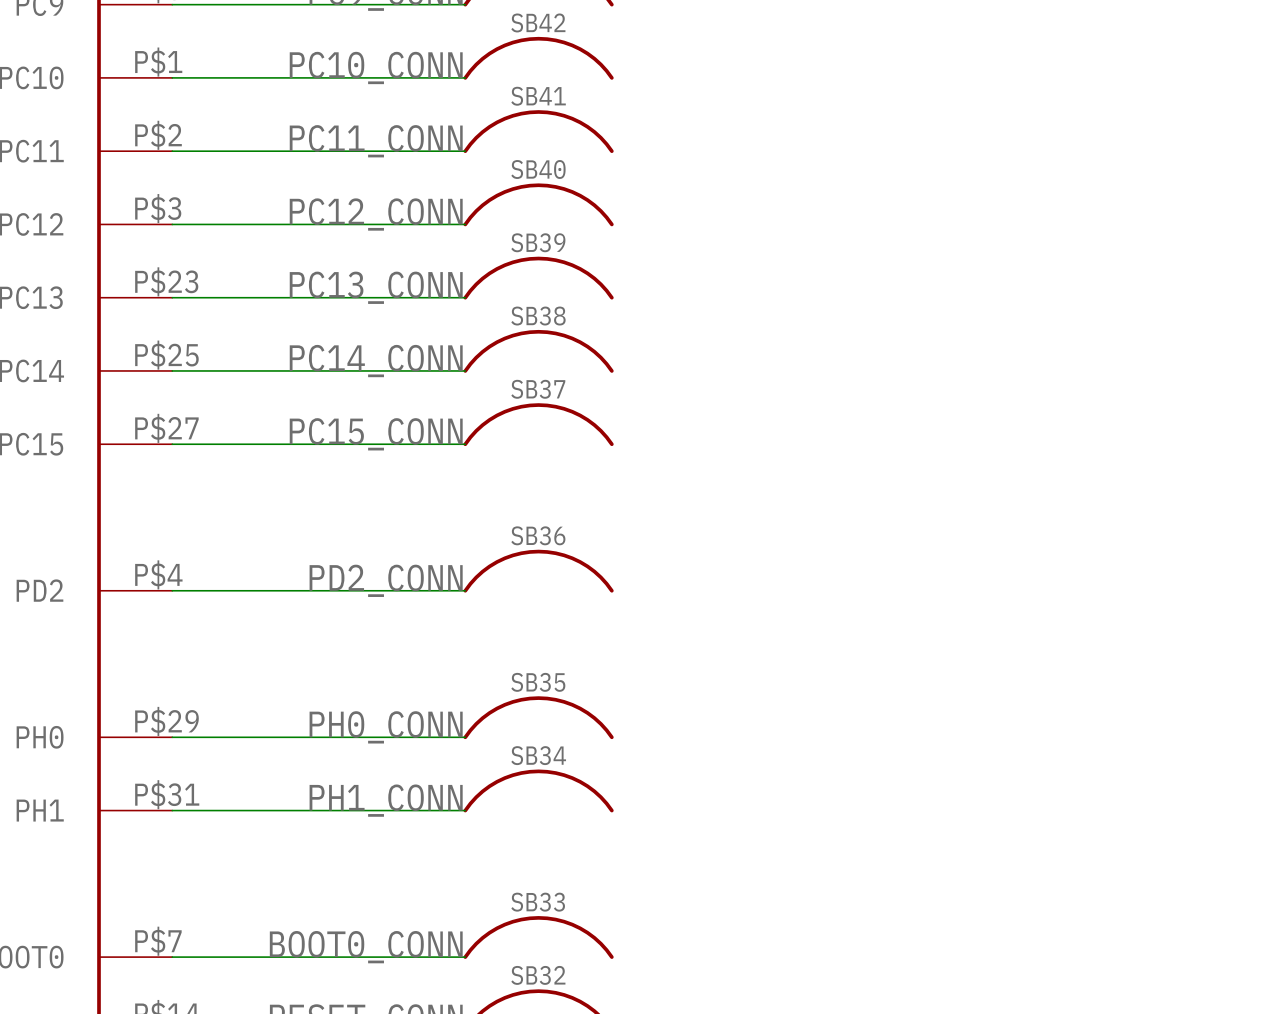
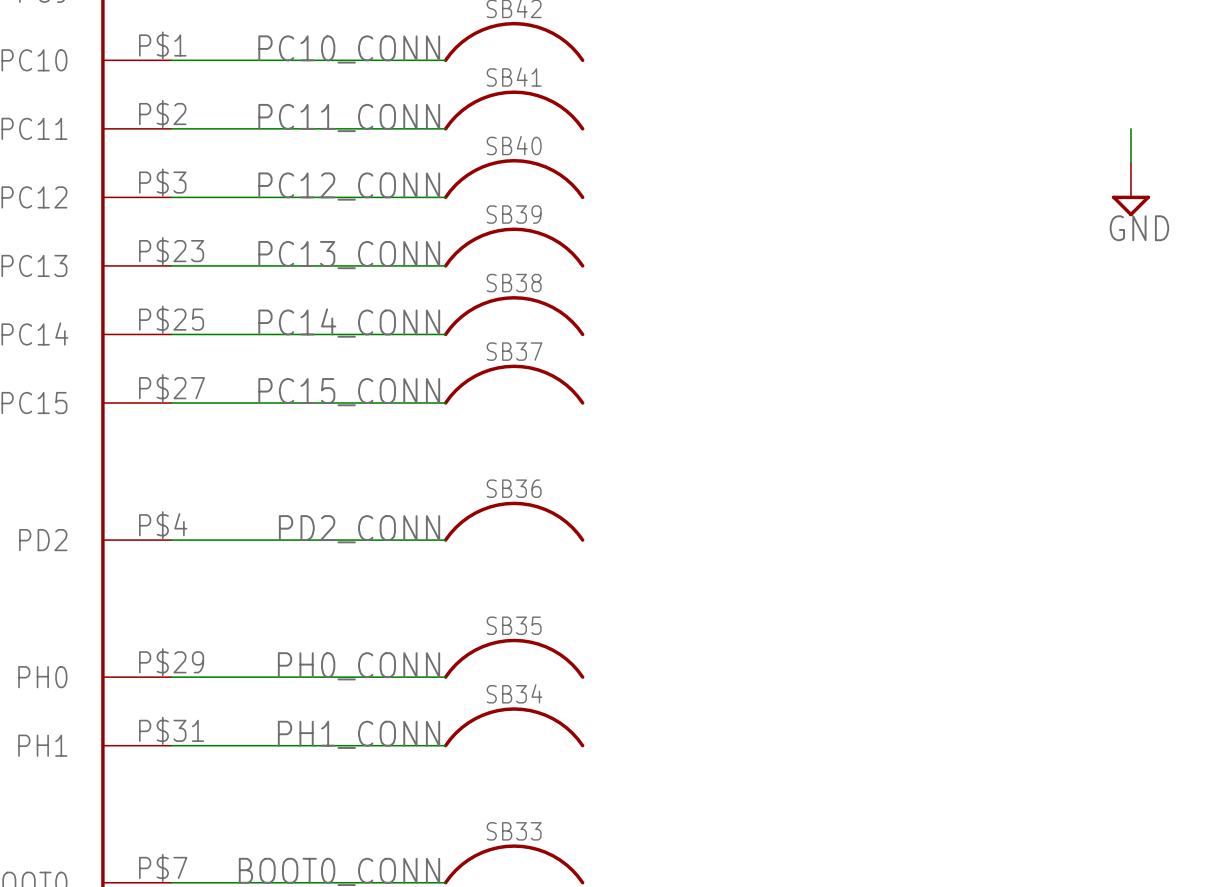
wire: none -> (1130, 128) (1130, 163)
power symbol: none -> GND (1130, 189)

